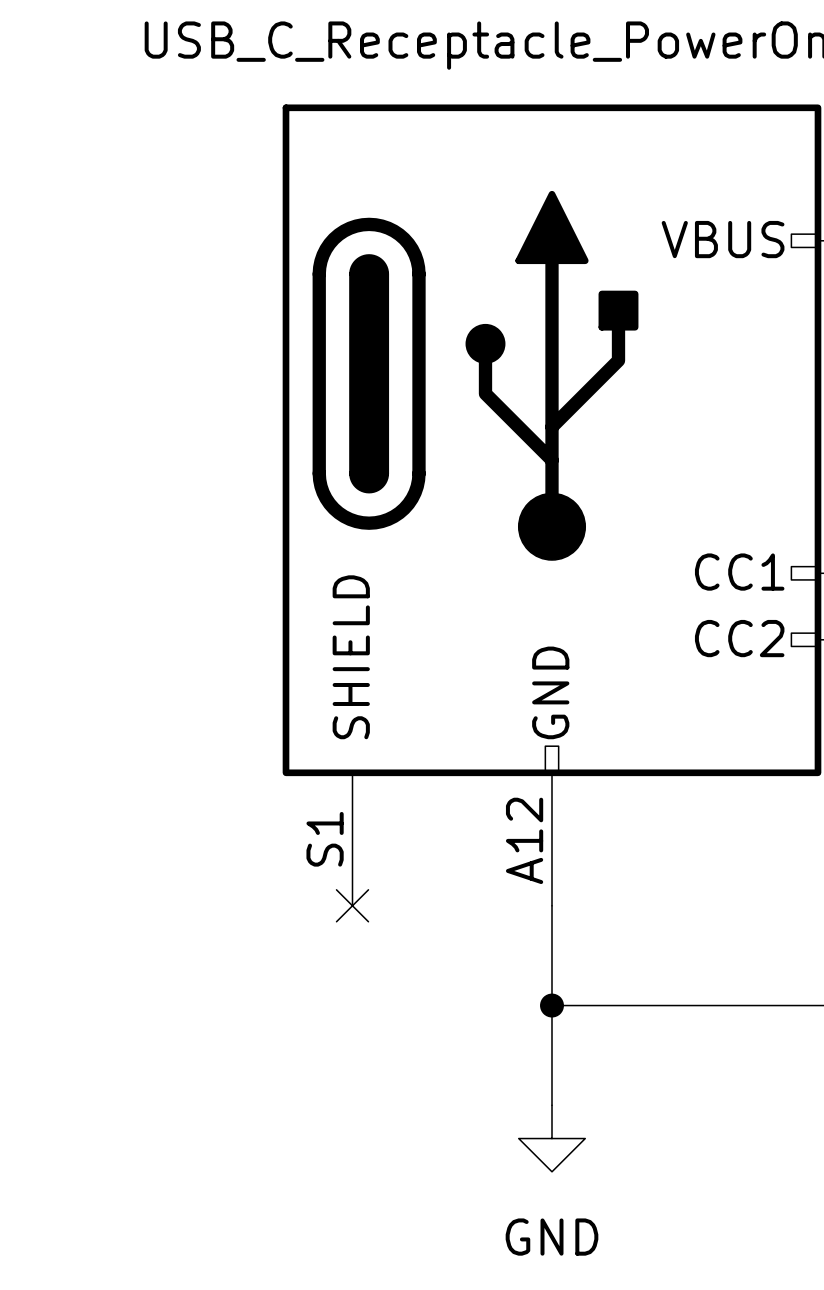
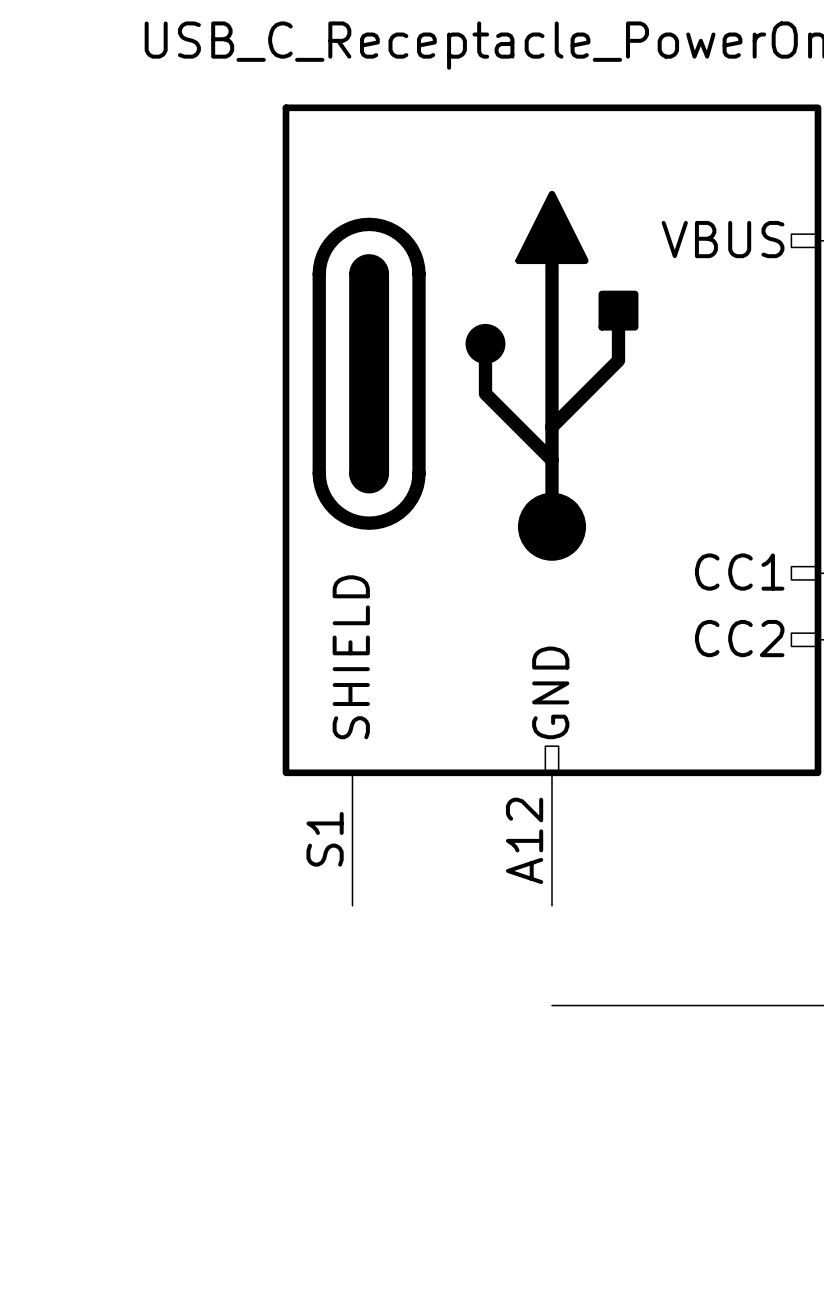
no-connect mark: (352, 905) -> none
wire: (552, 905) (552, 1105) -> none
junction: (552, 1005) -> none
power symbol: GND (552, 1138) -> none

